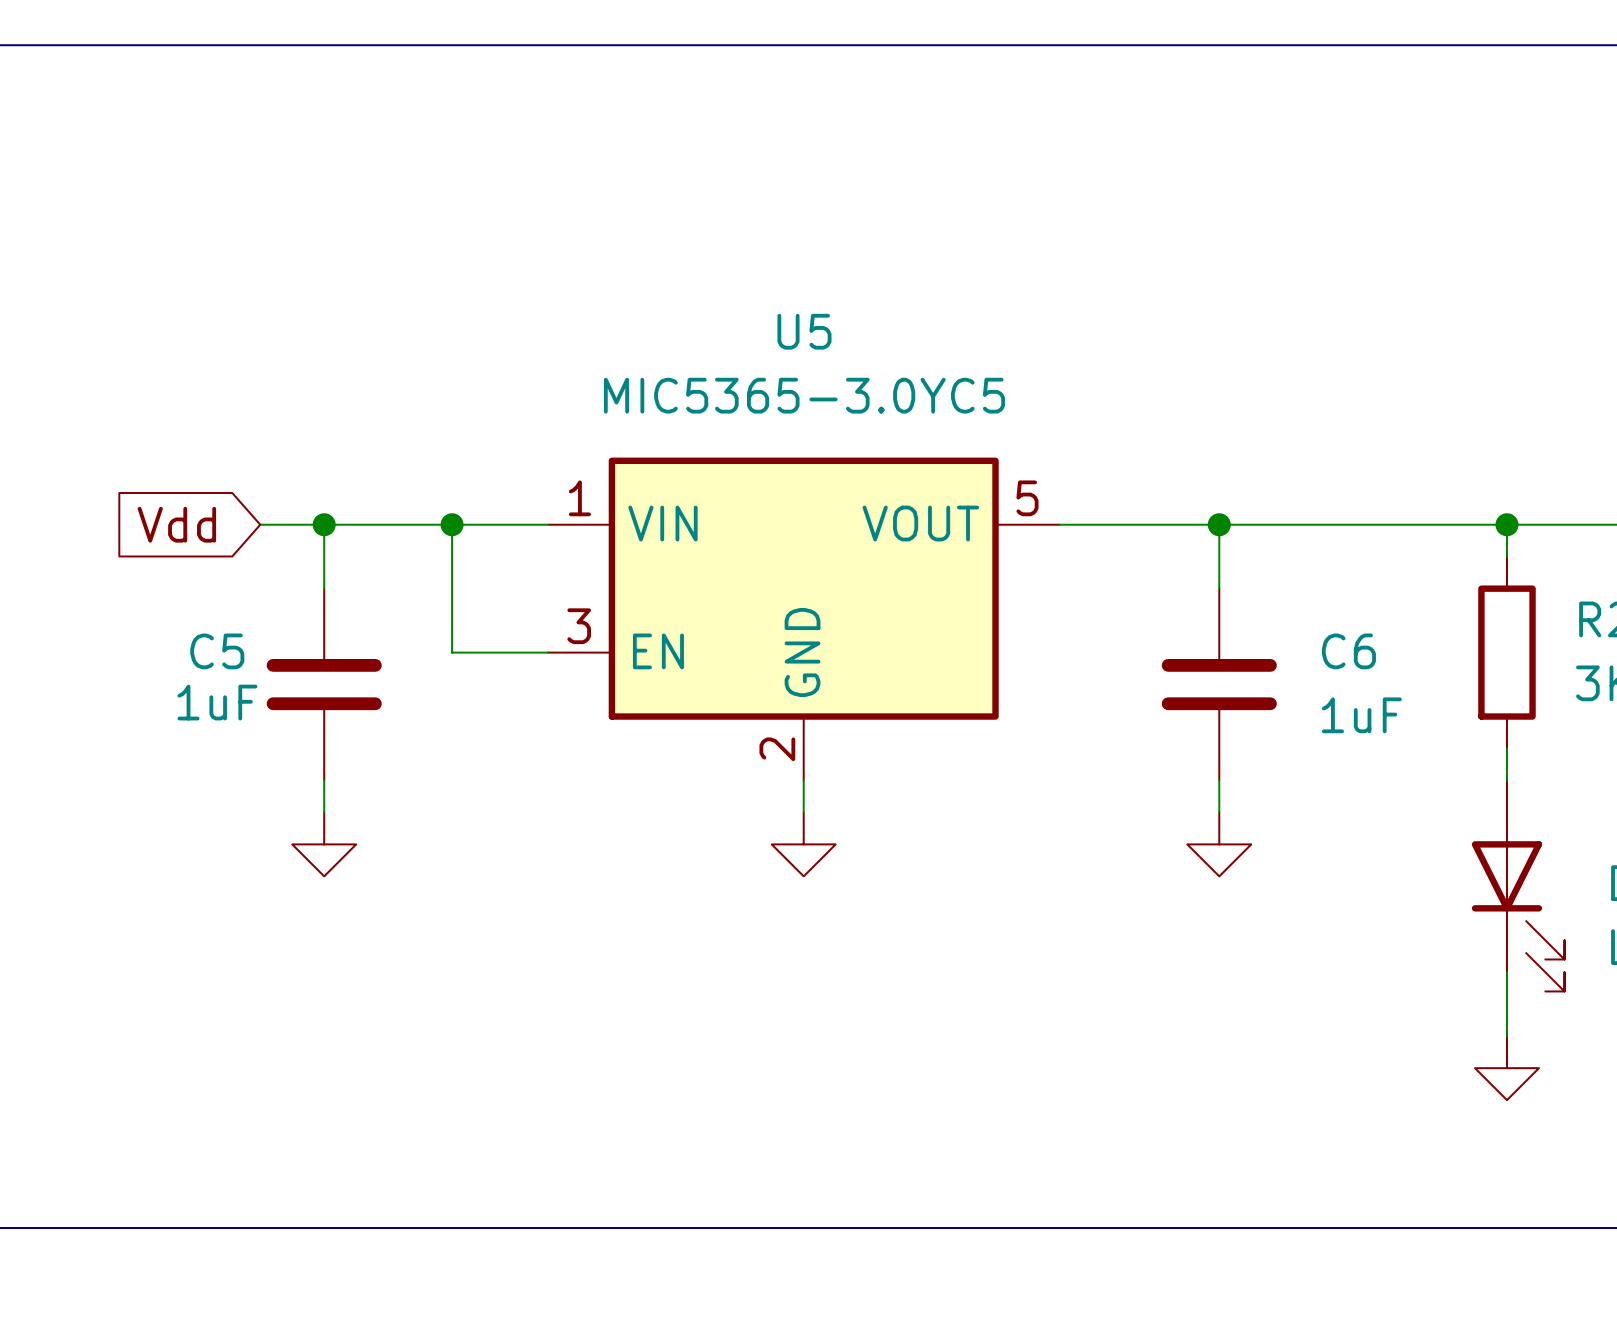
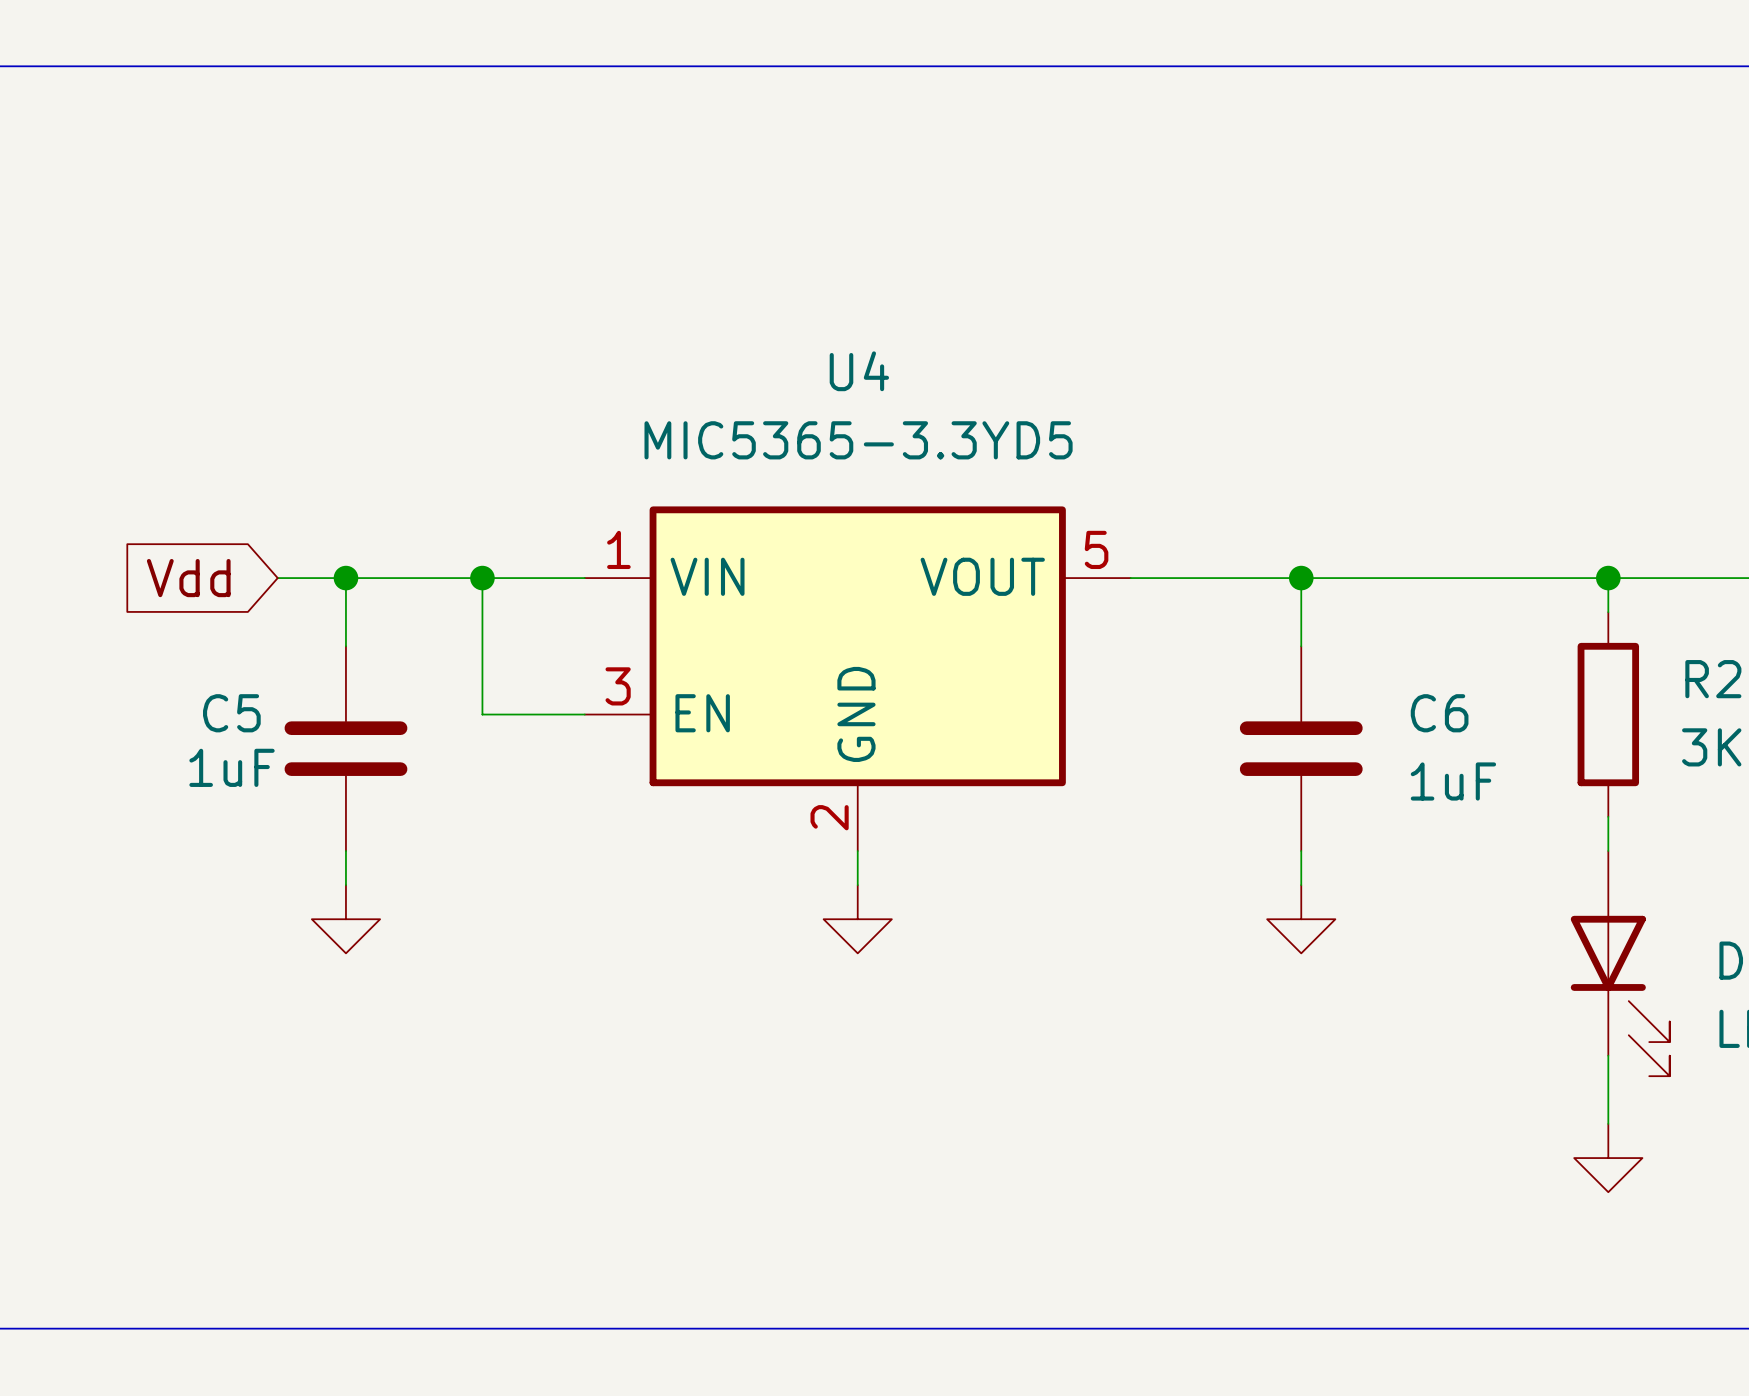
U5 name: U5 (804, 331) -> U4 (859, 371)
U5 value: MIC5365-3.0YC5 (804, 395) -> MIC5365-3.3YD5 (858, 440)

